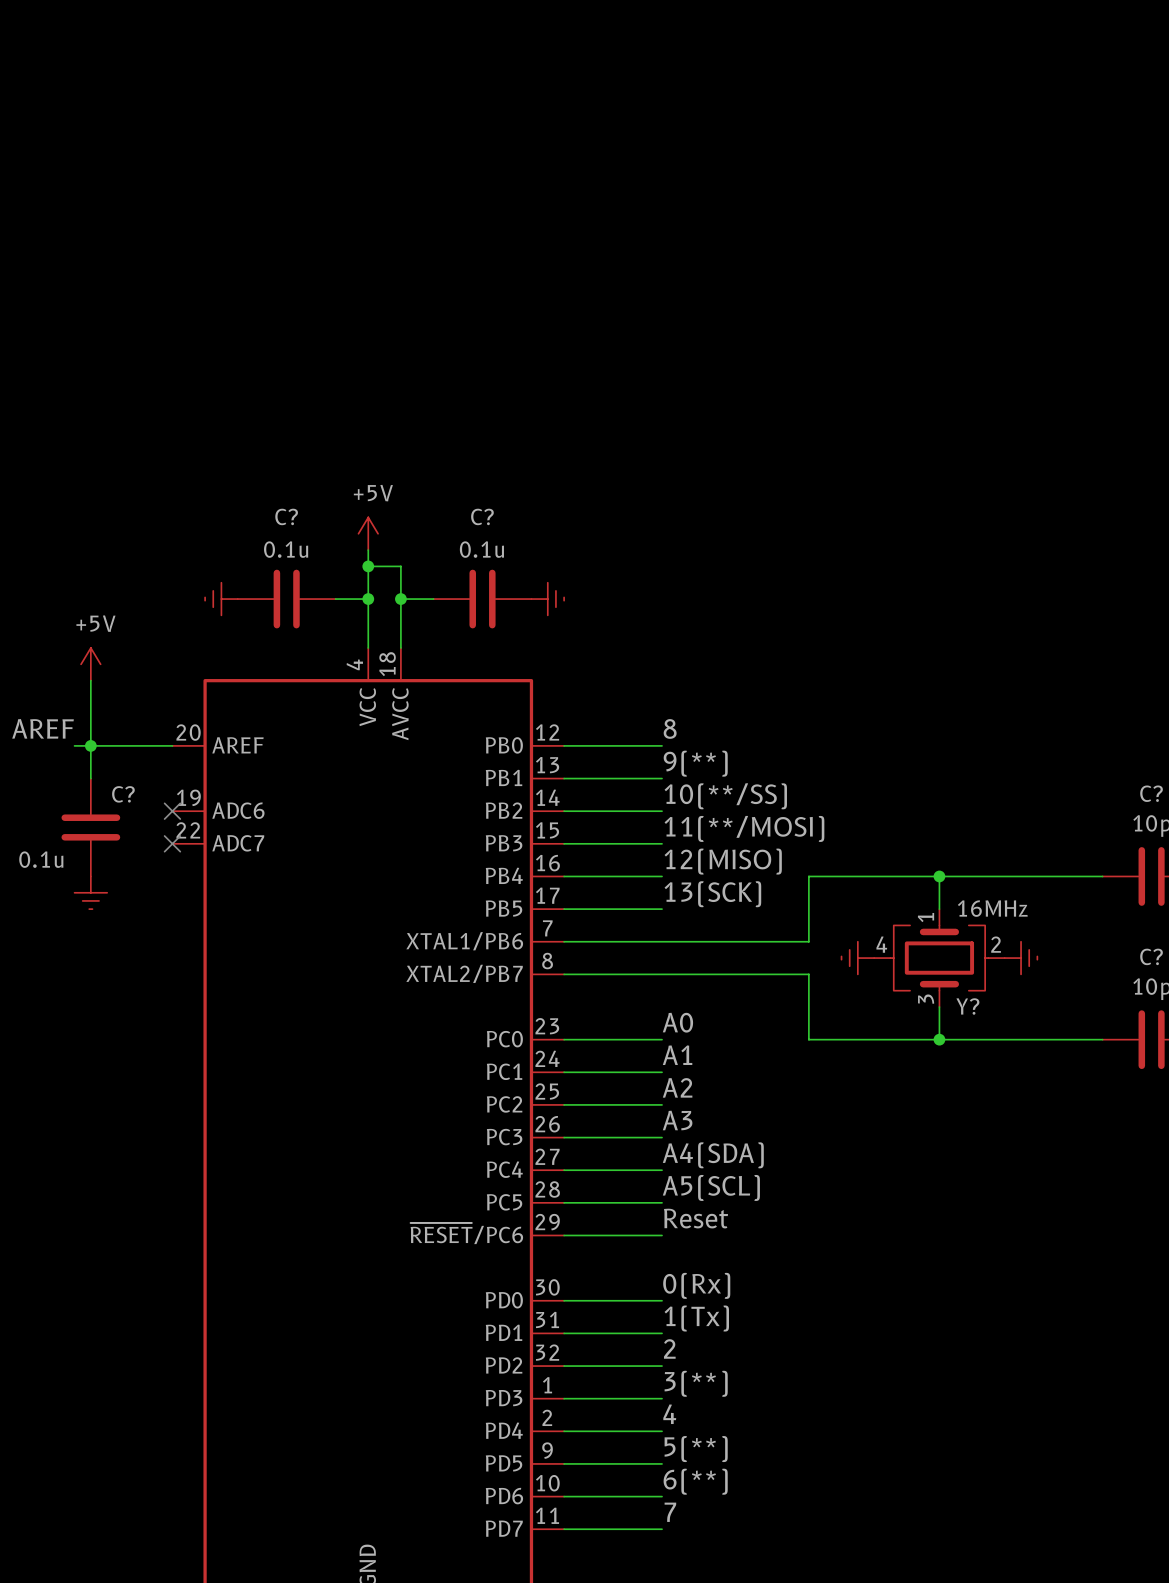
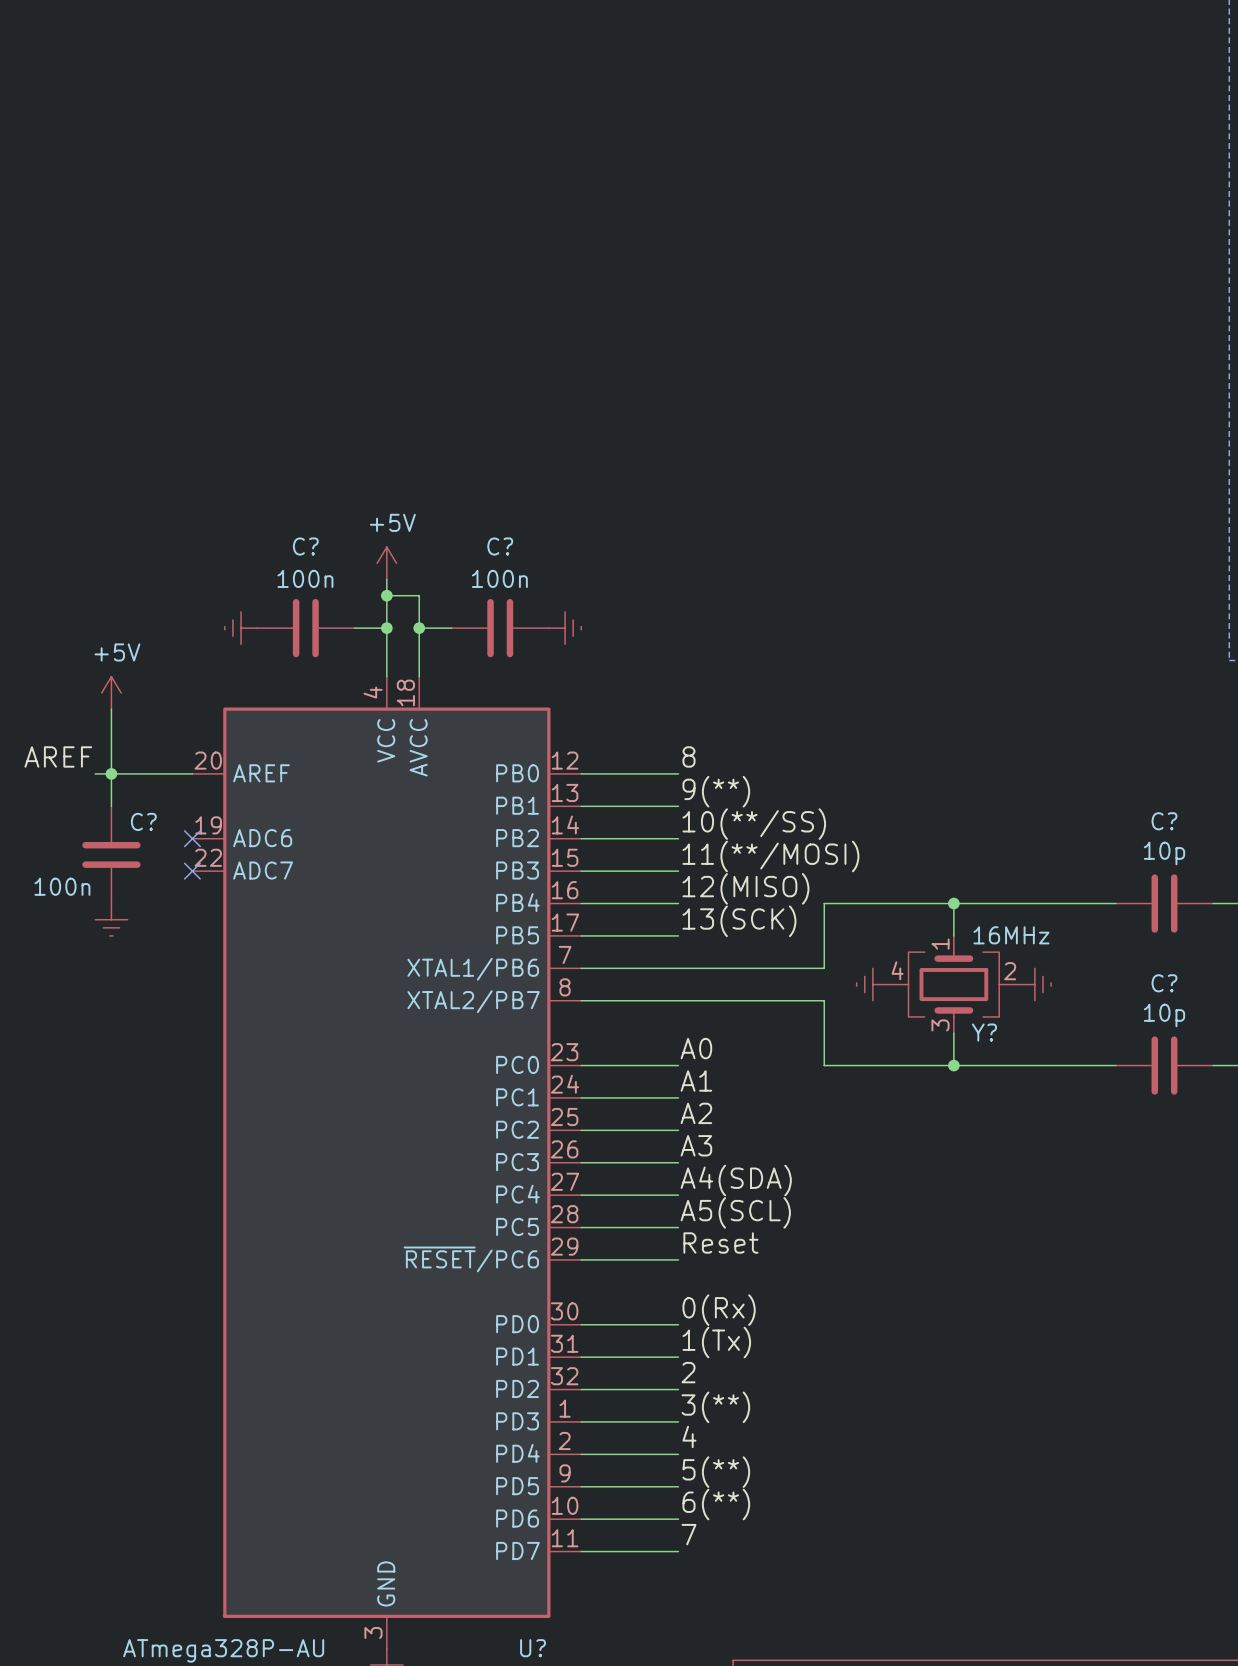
C? value: 0.1u (286, 549) -> 100n (305, 578)
C? value: 0.1u (481, 549) -> 100n (499, 578)
C? value: 0.1u (41, 859) -> 100n (62, 886)

